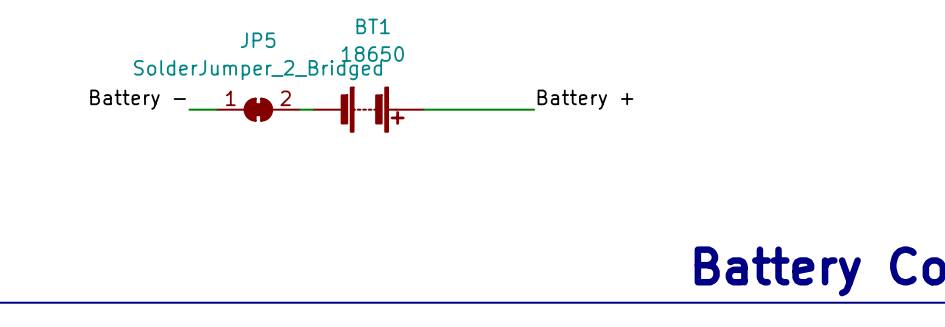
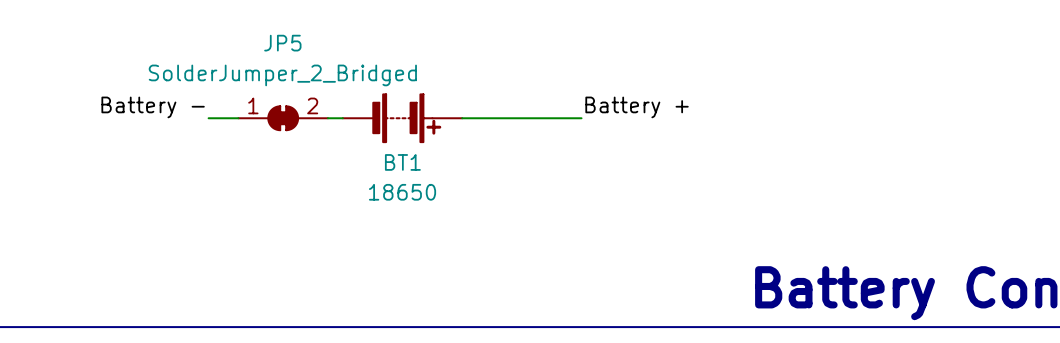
BT1 name position: BT1 (373, 26) -> BT1 (402, 162)
BT1 value position: 18650 (372, 54) -> 18650 (402, 192)

